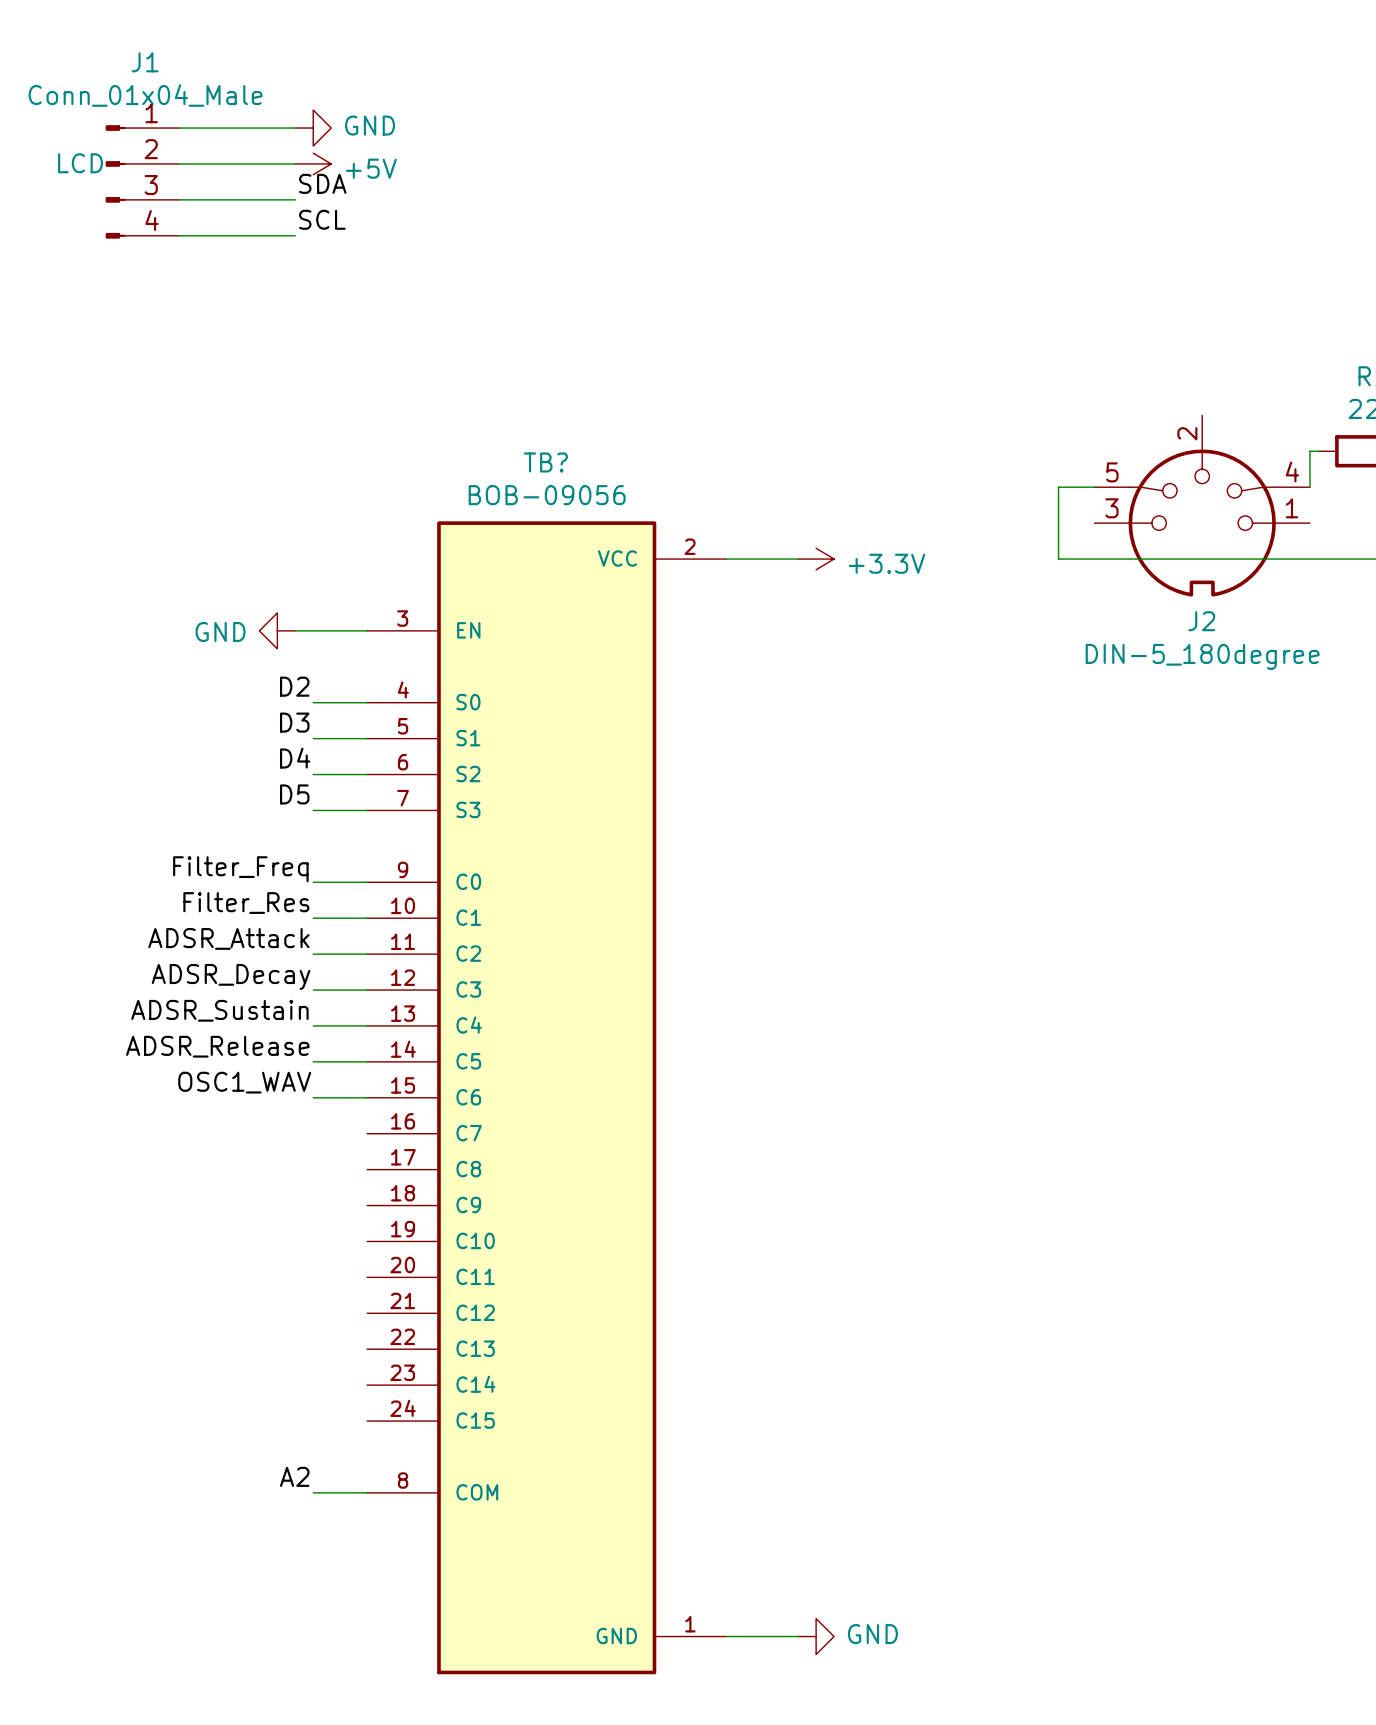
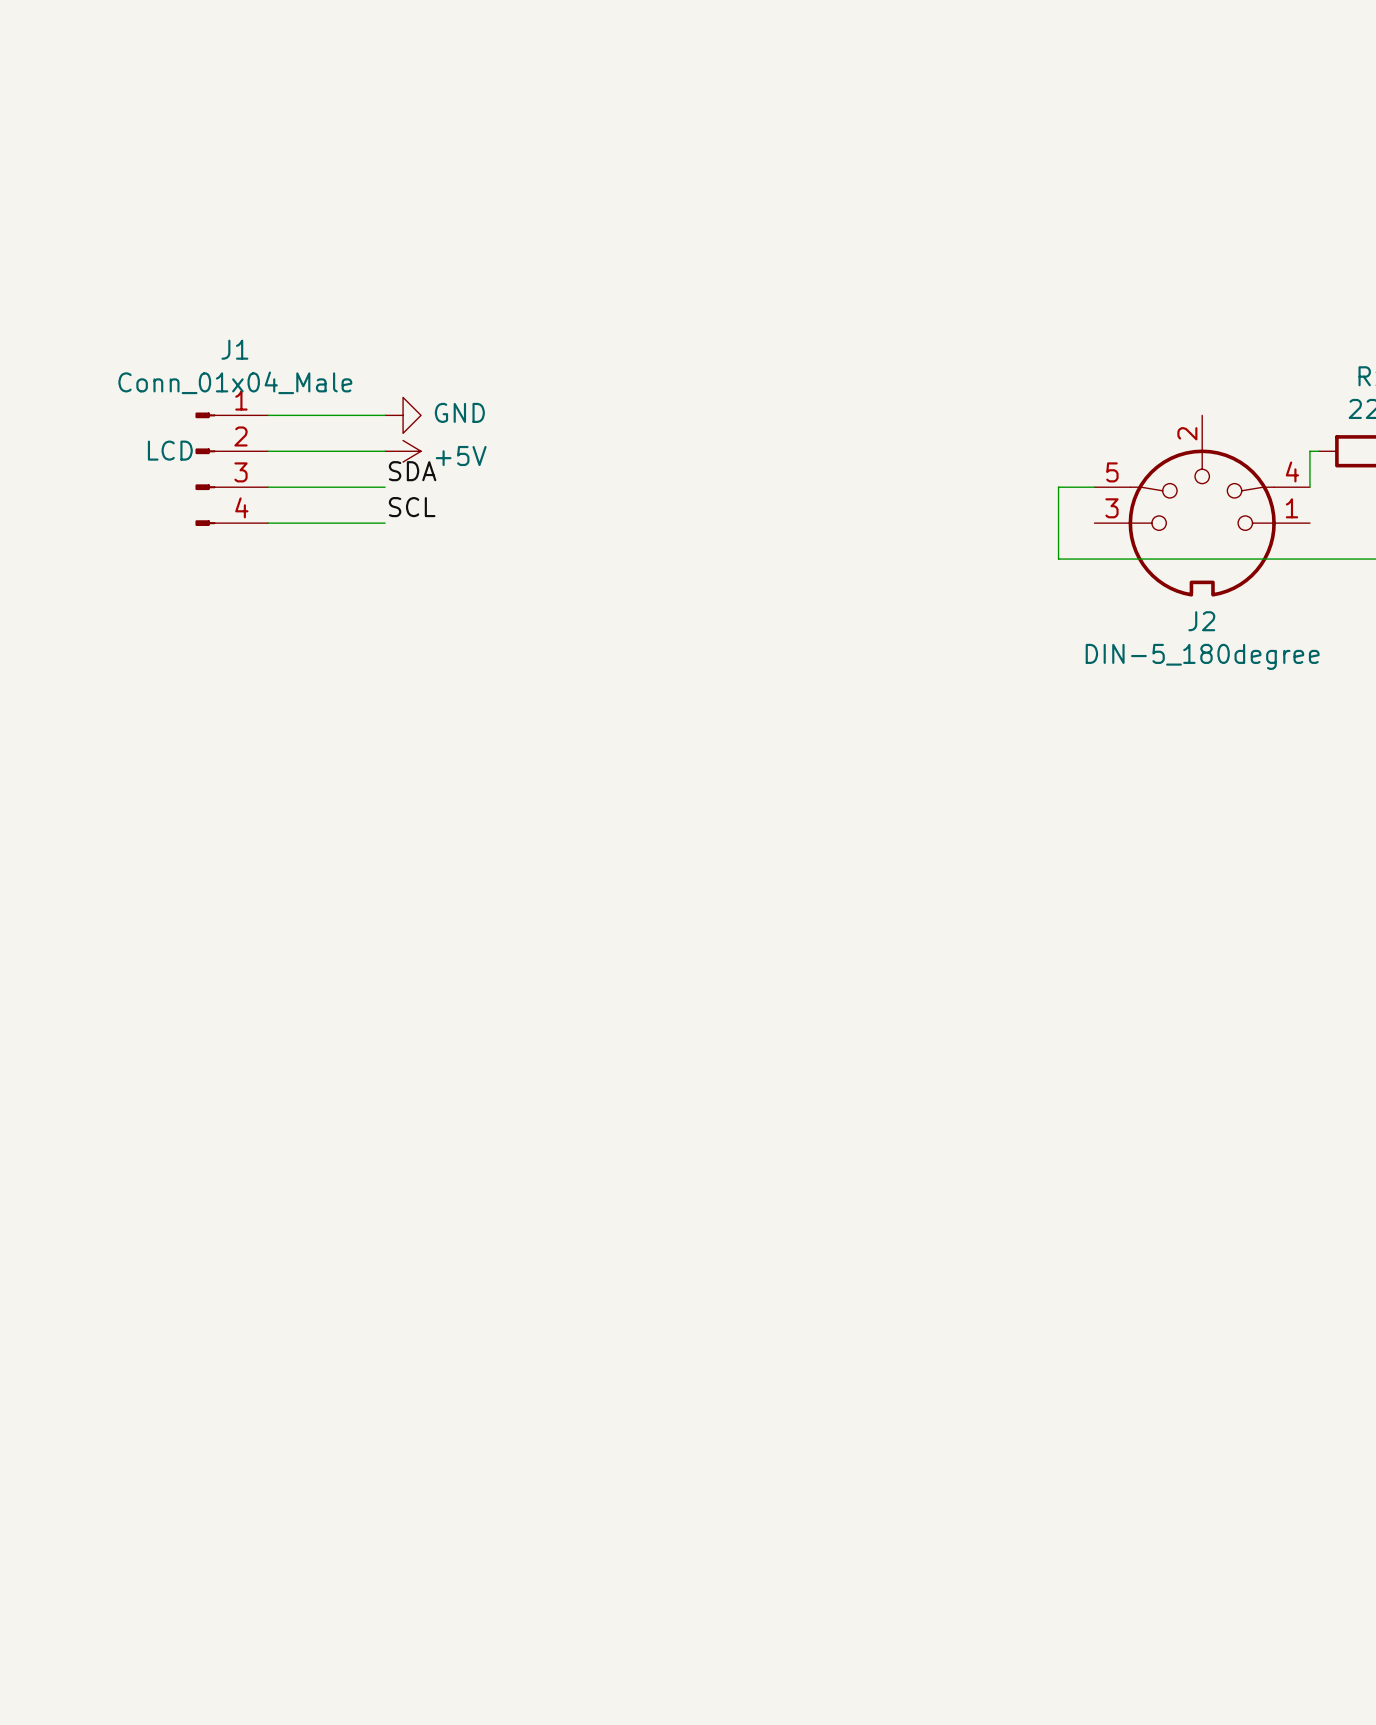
wire: (178, 128) (295, 128) -> (268, 415) (385, 415)
power symbol: GND (313, 128) -> none
wire: (178, 163) (295, 163) -> (268, 451) (385, 451)
power symbol position: +5V (313, 163) -> +5V (403, 451)
J1 position: (142, 181) -> (231, 469)
label position: SDA (322, 183) -> SDA (412, 471)
wire: (178, 199) (295, 199) -> (268, 487) (385, 487)
label position: SCL (322, 219) -> SCL (412, 507)
wire: (178, 235) (295, 235) -> (268, 523) (385, 523)
power symbol: none -> GND (403, 415)
wire: (726, 559) (798, 559) -> none
power symbol: +3.3V (816, 559) -> none
power symbol: GND (277, 630) -> none
wire: (295, 630) (367, 630) -> none
label: D2 (294, 686) -> none
wire: (313, 702) (367, 702) -> none
label: D3 (294, 722) -> none
wire: (313, 738) (367, 738) -> none
label: D4 (295, 758) -> none
wire: (313, 774) (367, 774) -> none
label: D5 (294, 794) -> none
wire: (313, 810) (367, 810) -> none
label: Filter_Freq (240, 869) -> none
wire: (313, 882) (367, 882) -> none
label: Filter_Res (246, 903) -> none
wire: (313, 918) (367, 918) -> none
label: ADSR_Attack (228, 938) -> none
wire: (313, 954) (367, 954) -> none
label: ADSR_Decay (231, 977) -> none
wire: (313, 990) (367, 990) -> none
label: ADSR_Sustain (219, 1010) -> none
wire: (313, 1025) (367, 1025) -> none
label: ADSR_Release (217, 1046) -> none
wire: (313, 1061) (367, 1061) -> none
label: OSC1_WAV (244, 1082) -> none
wire: (313, 1097) (367, 1097) -> none
TB?: BOB-09056 (546, 1097) -> none
label: A2 (294, 1476) -> none
wire: (313, 1492) (367, 1492) -> none
wire: (726, 1636) (798, 1636) -> none
power symbol: GND (816, 1636) -> none

